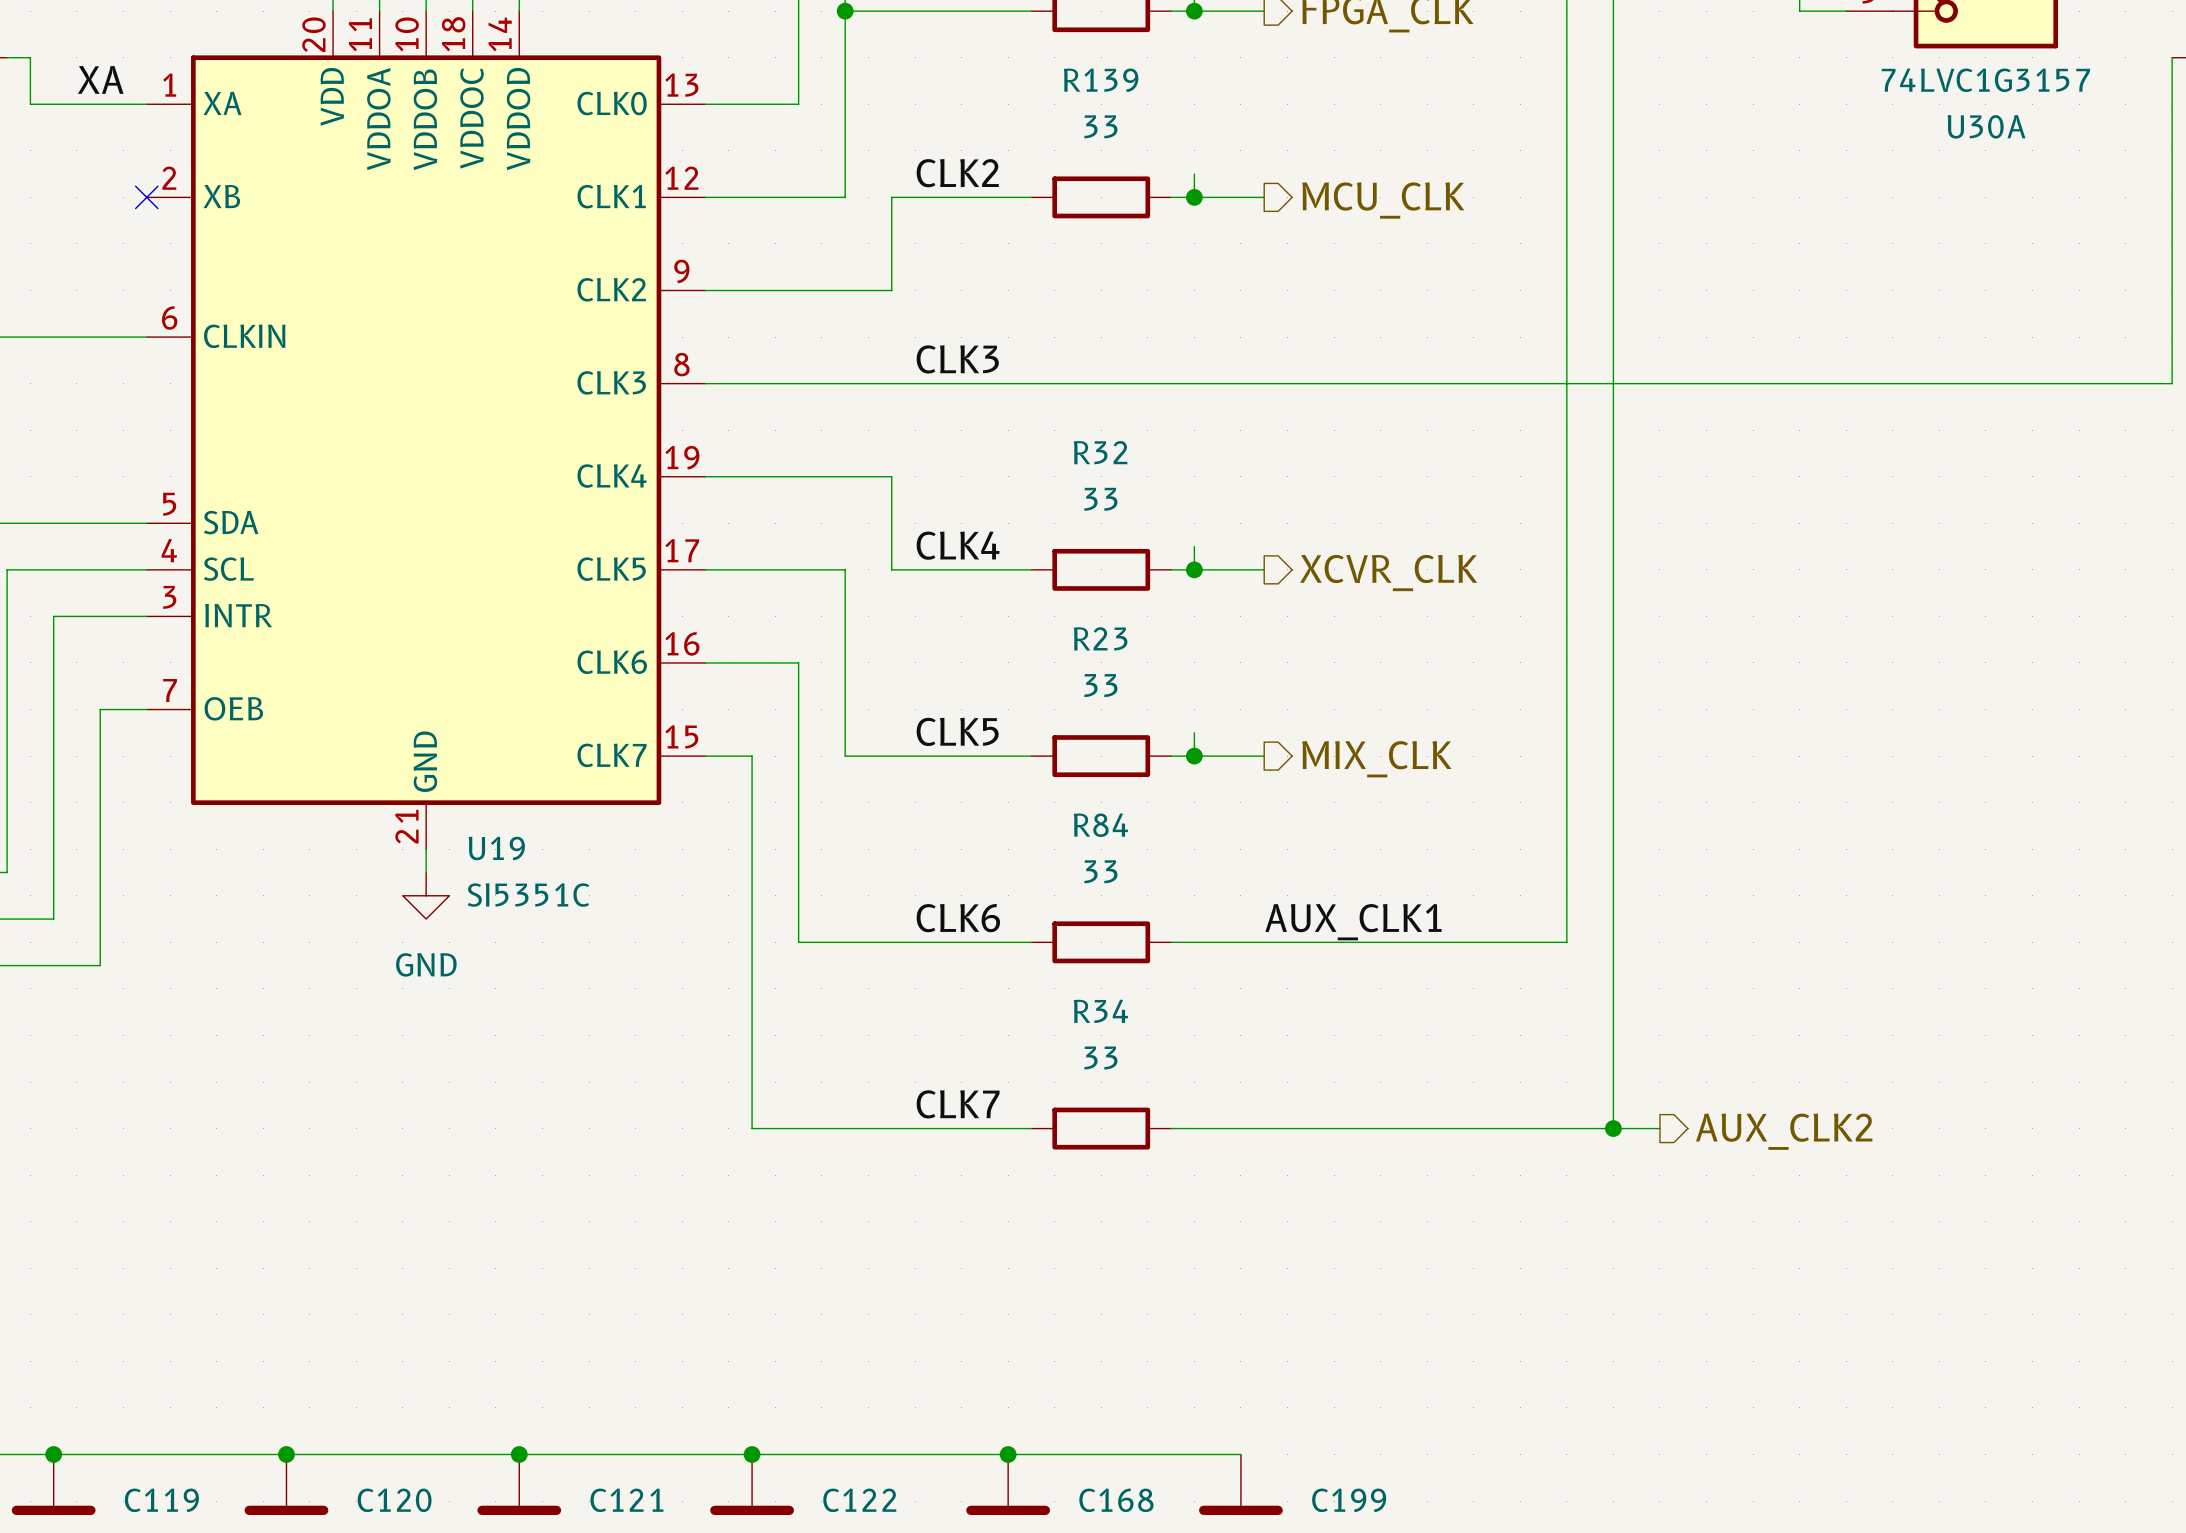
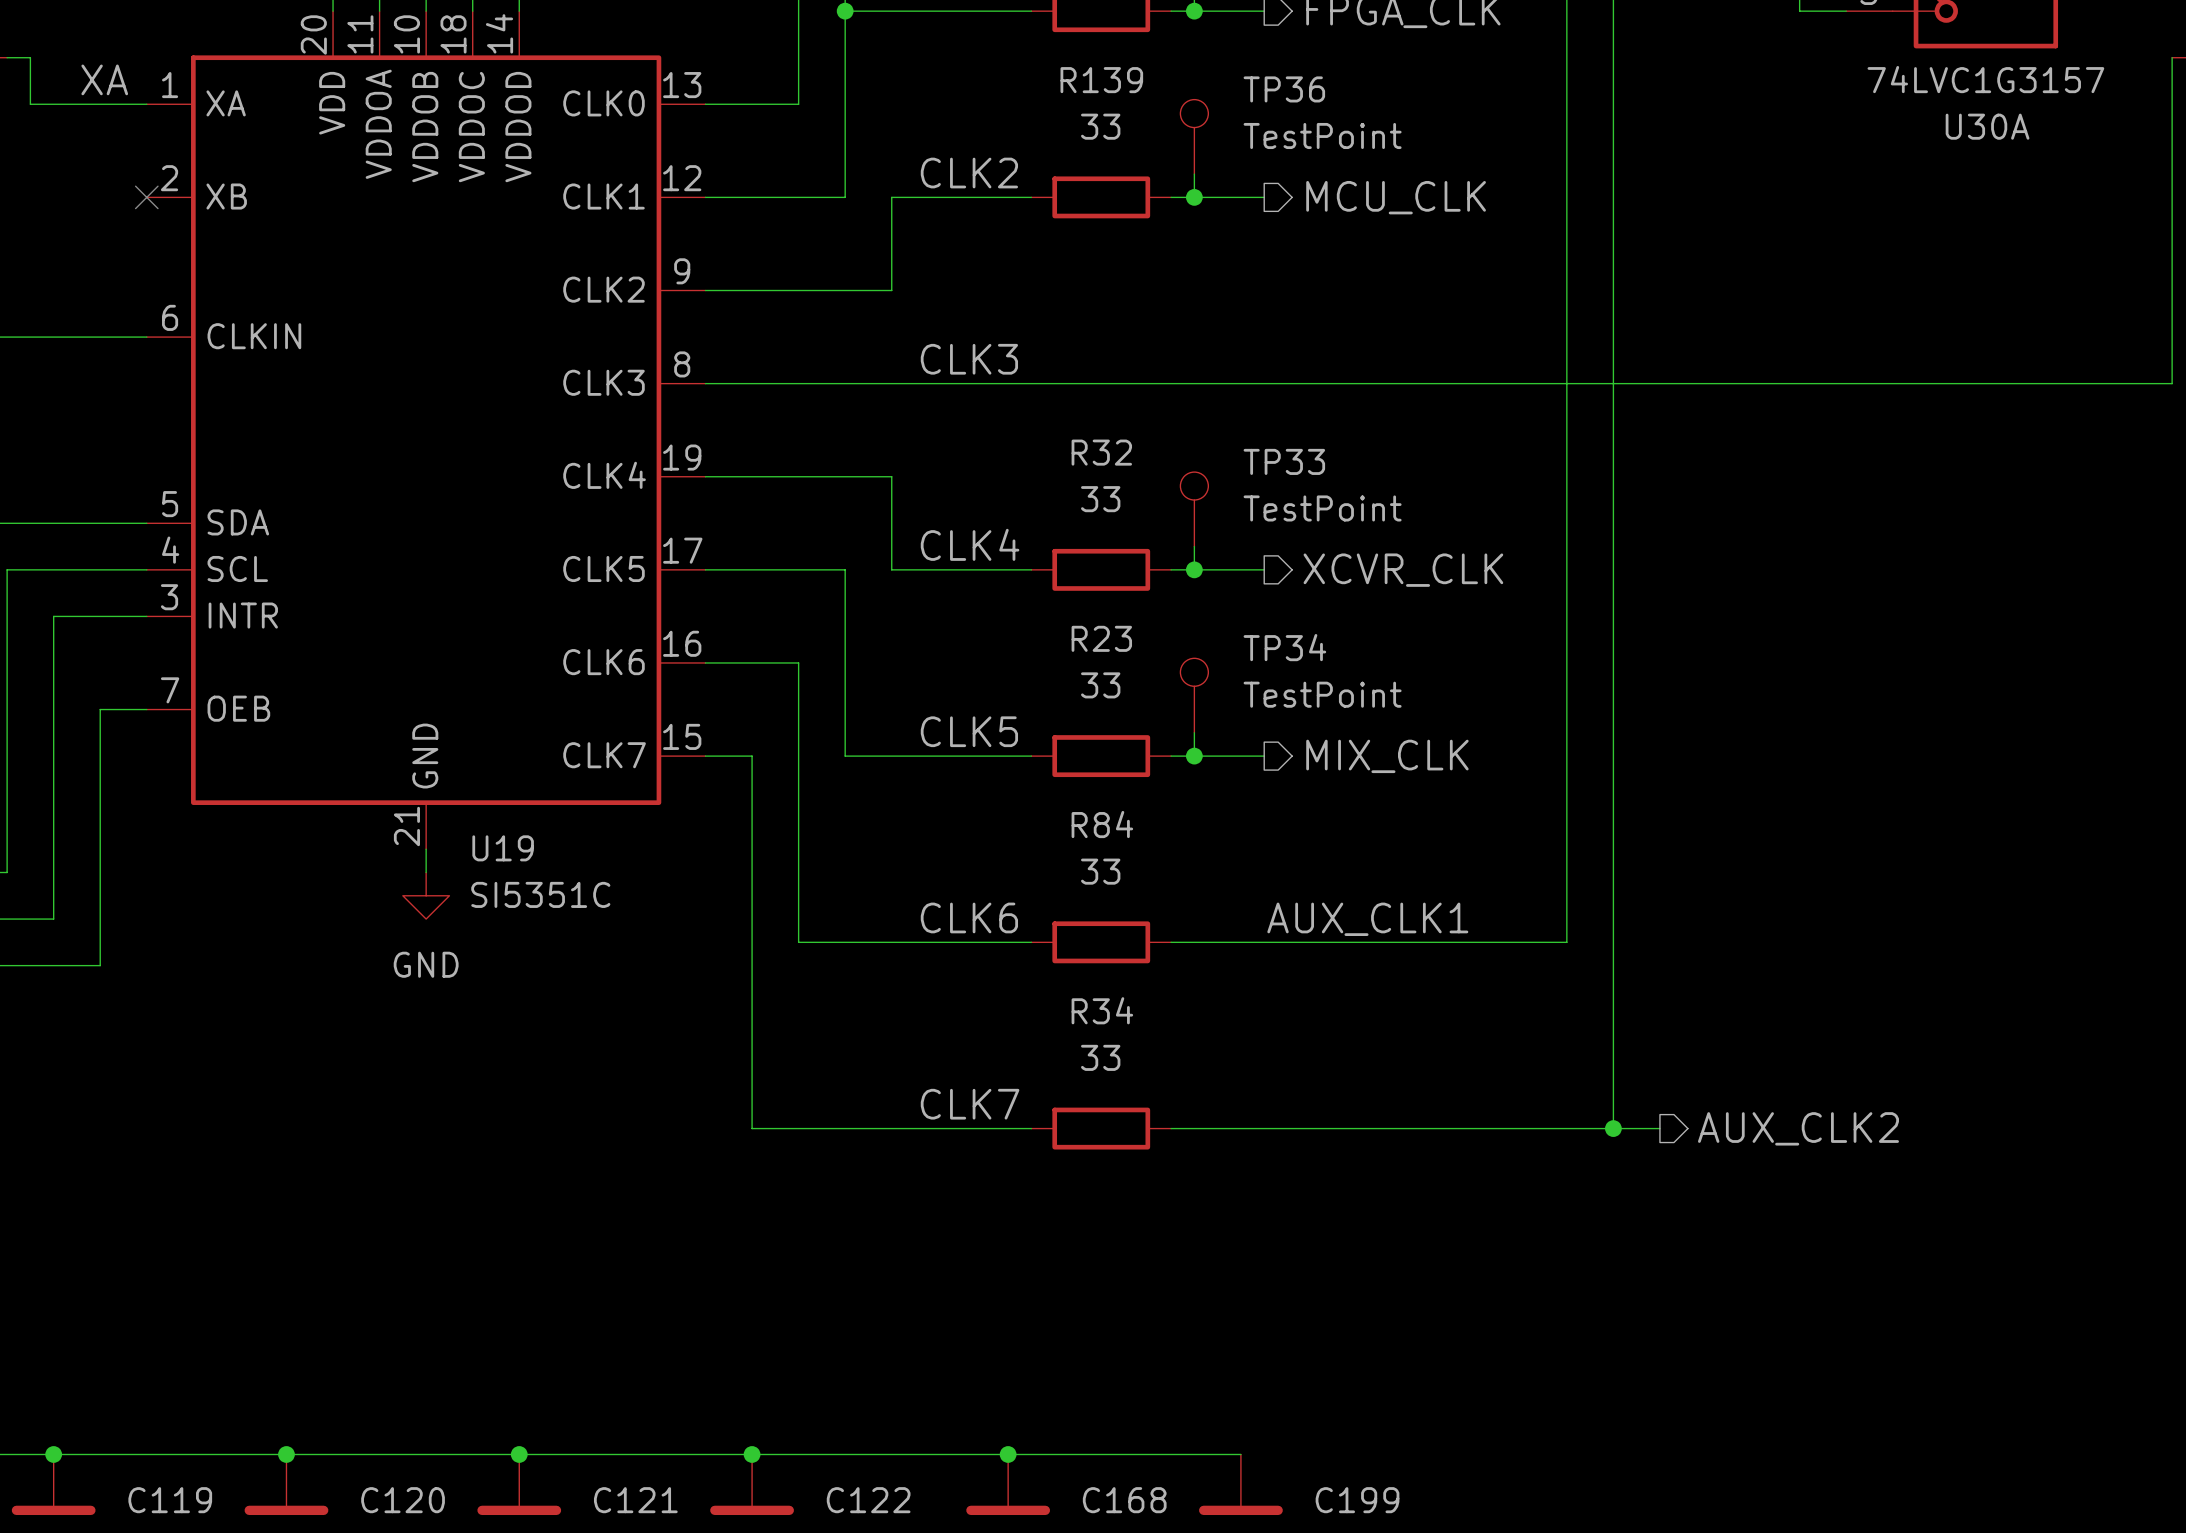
TP36: none -> TestPoint (1194, 136)
TP33: none -> TestPoint (1194, 509)
TP34: none -> TestPoint (1194, 695)

